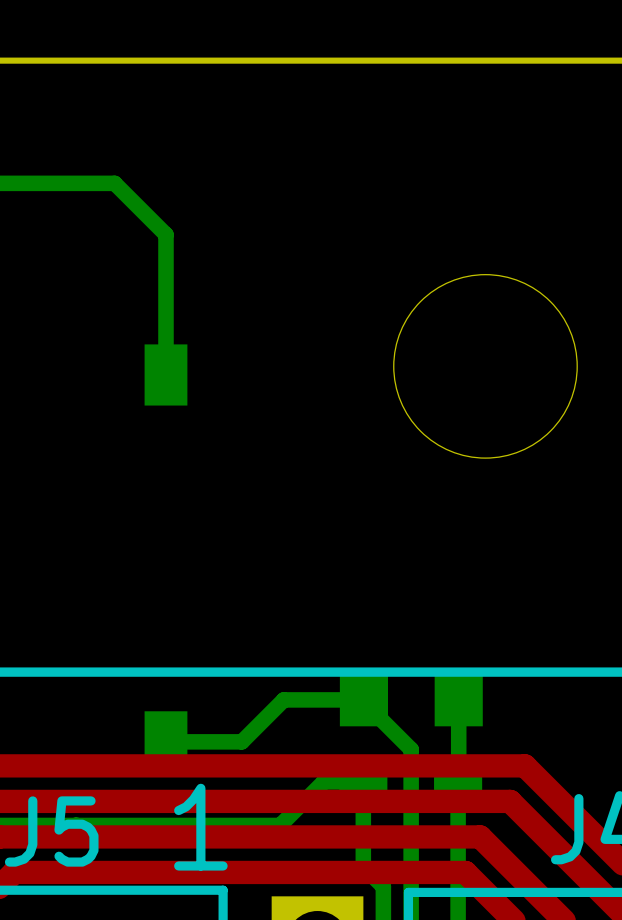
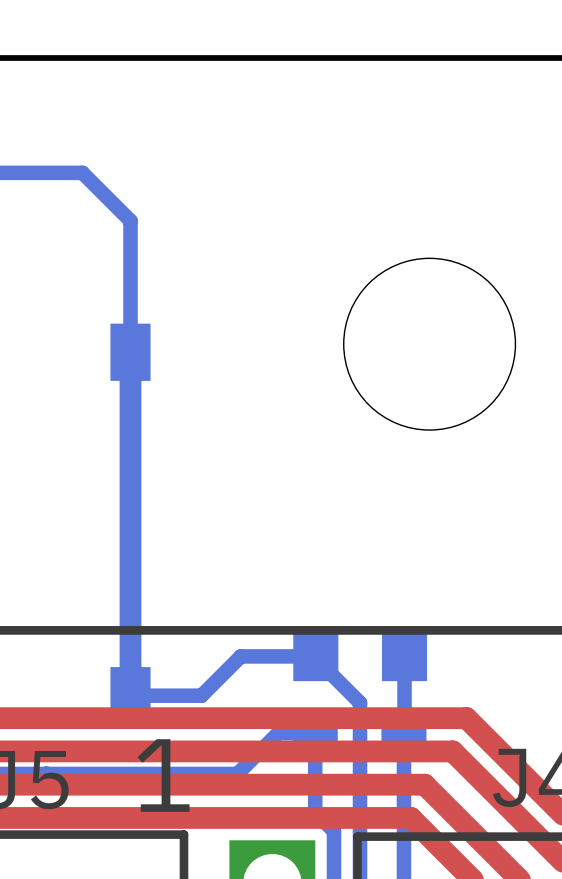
bottom track: none -> (130, 352) (130, 695)

